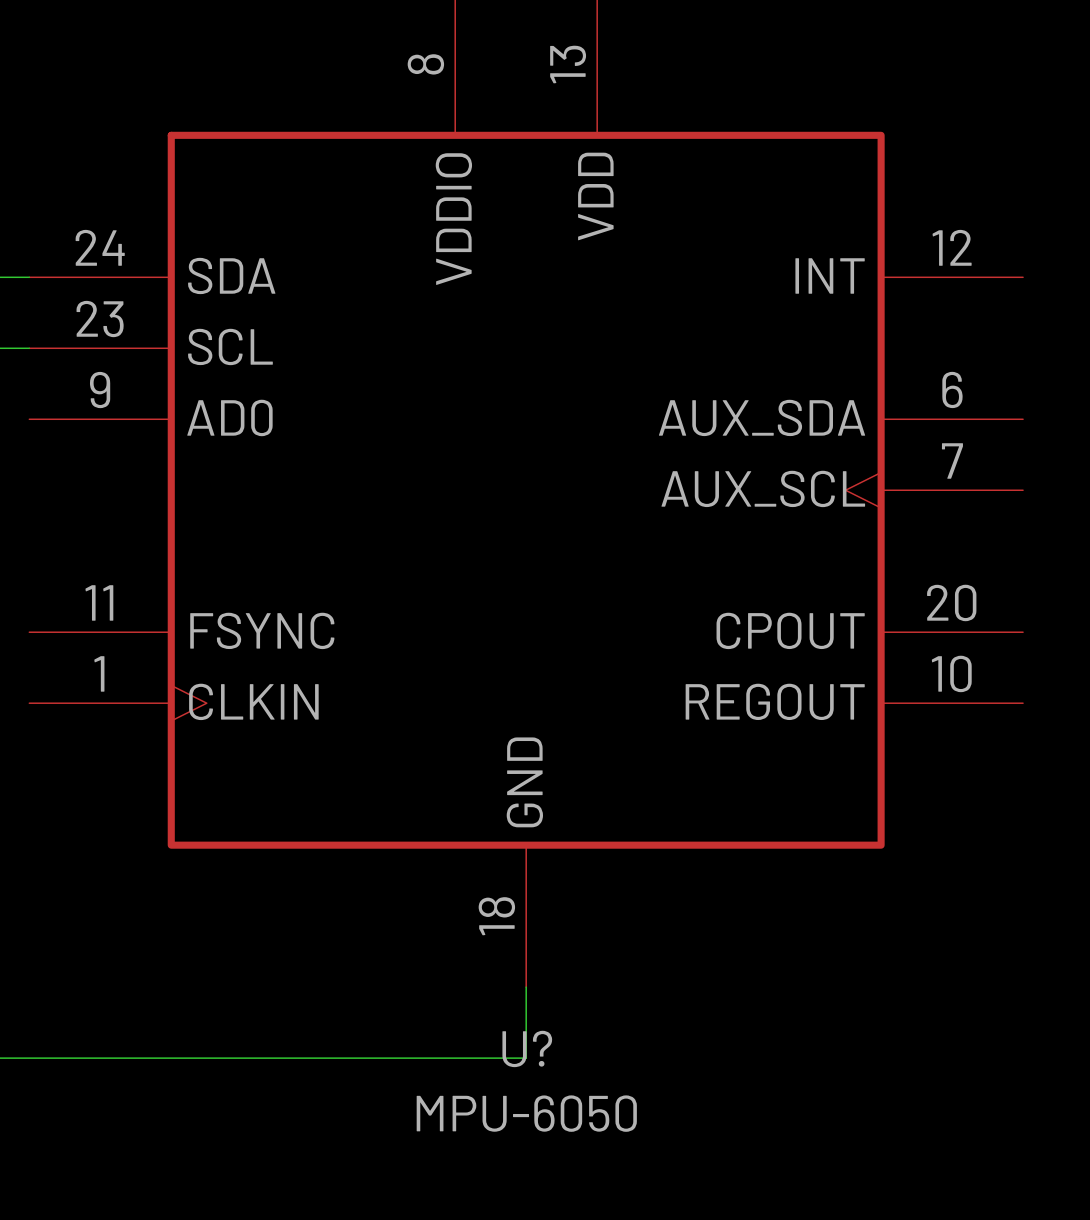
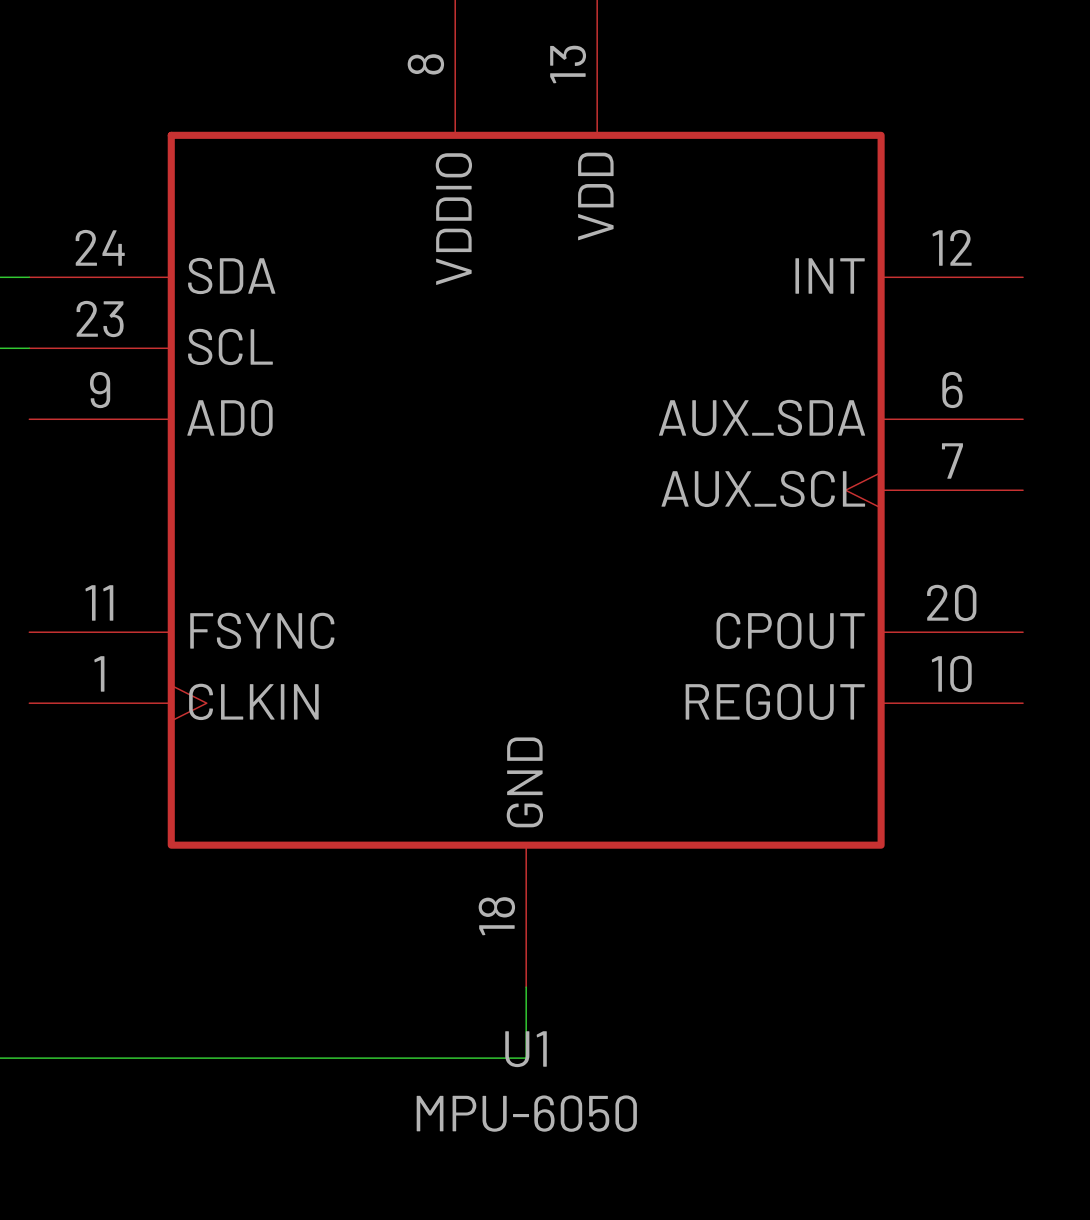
U? name: U? (527, 1048) -> U1 (526, 1049)

